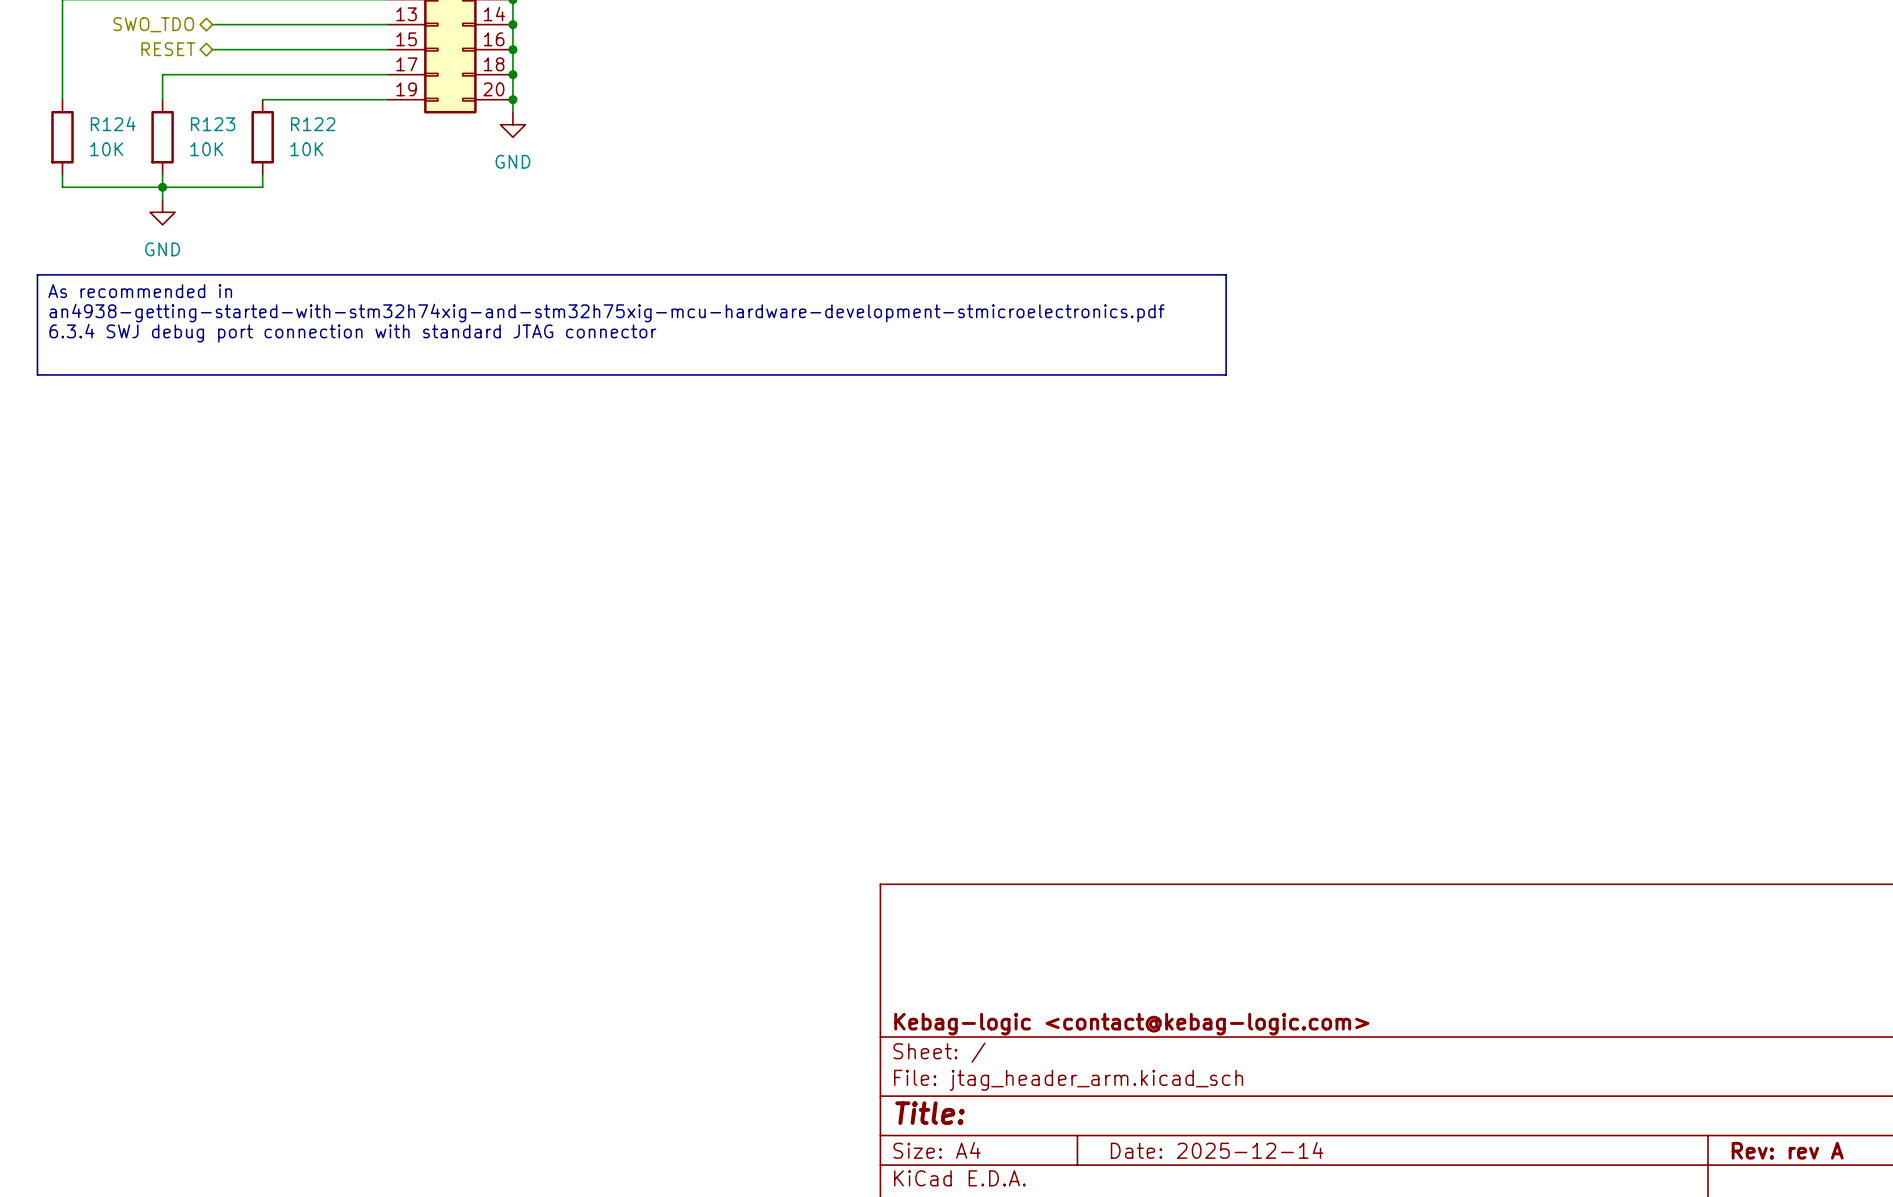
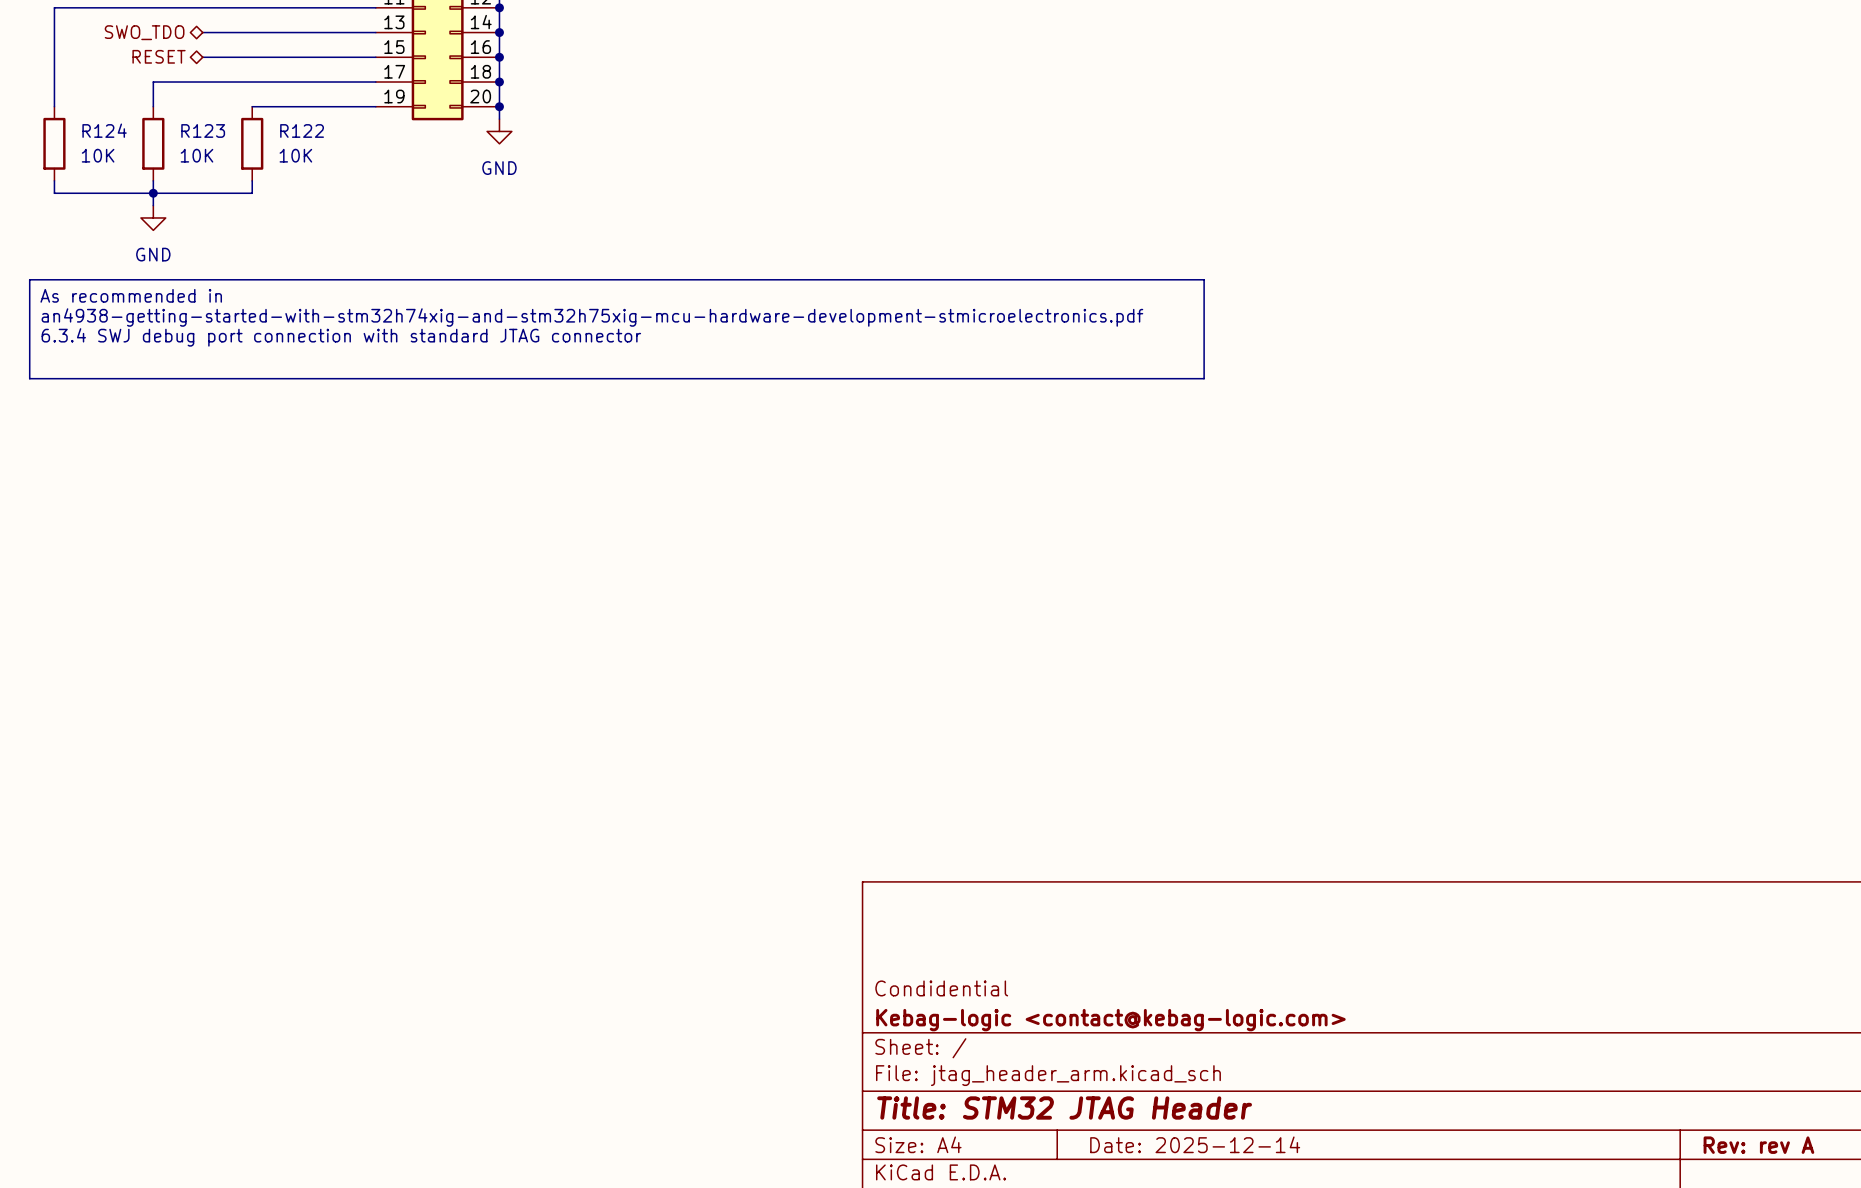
title block: none -> Condidential (941, 988)
title block: Title: (929, 1113) -> Title: STM32 JTAG Header (1064, 1108)

